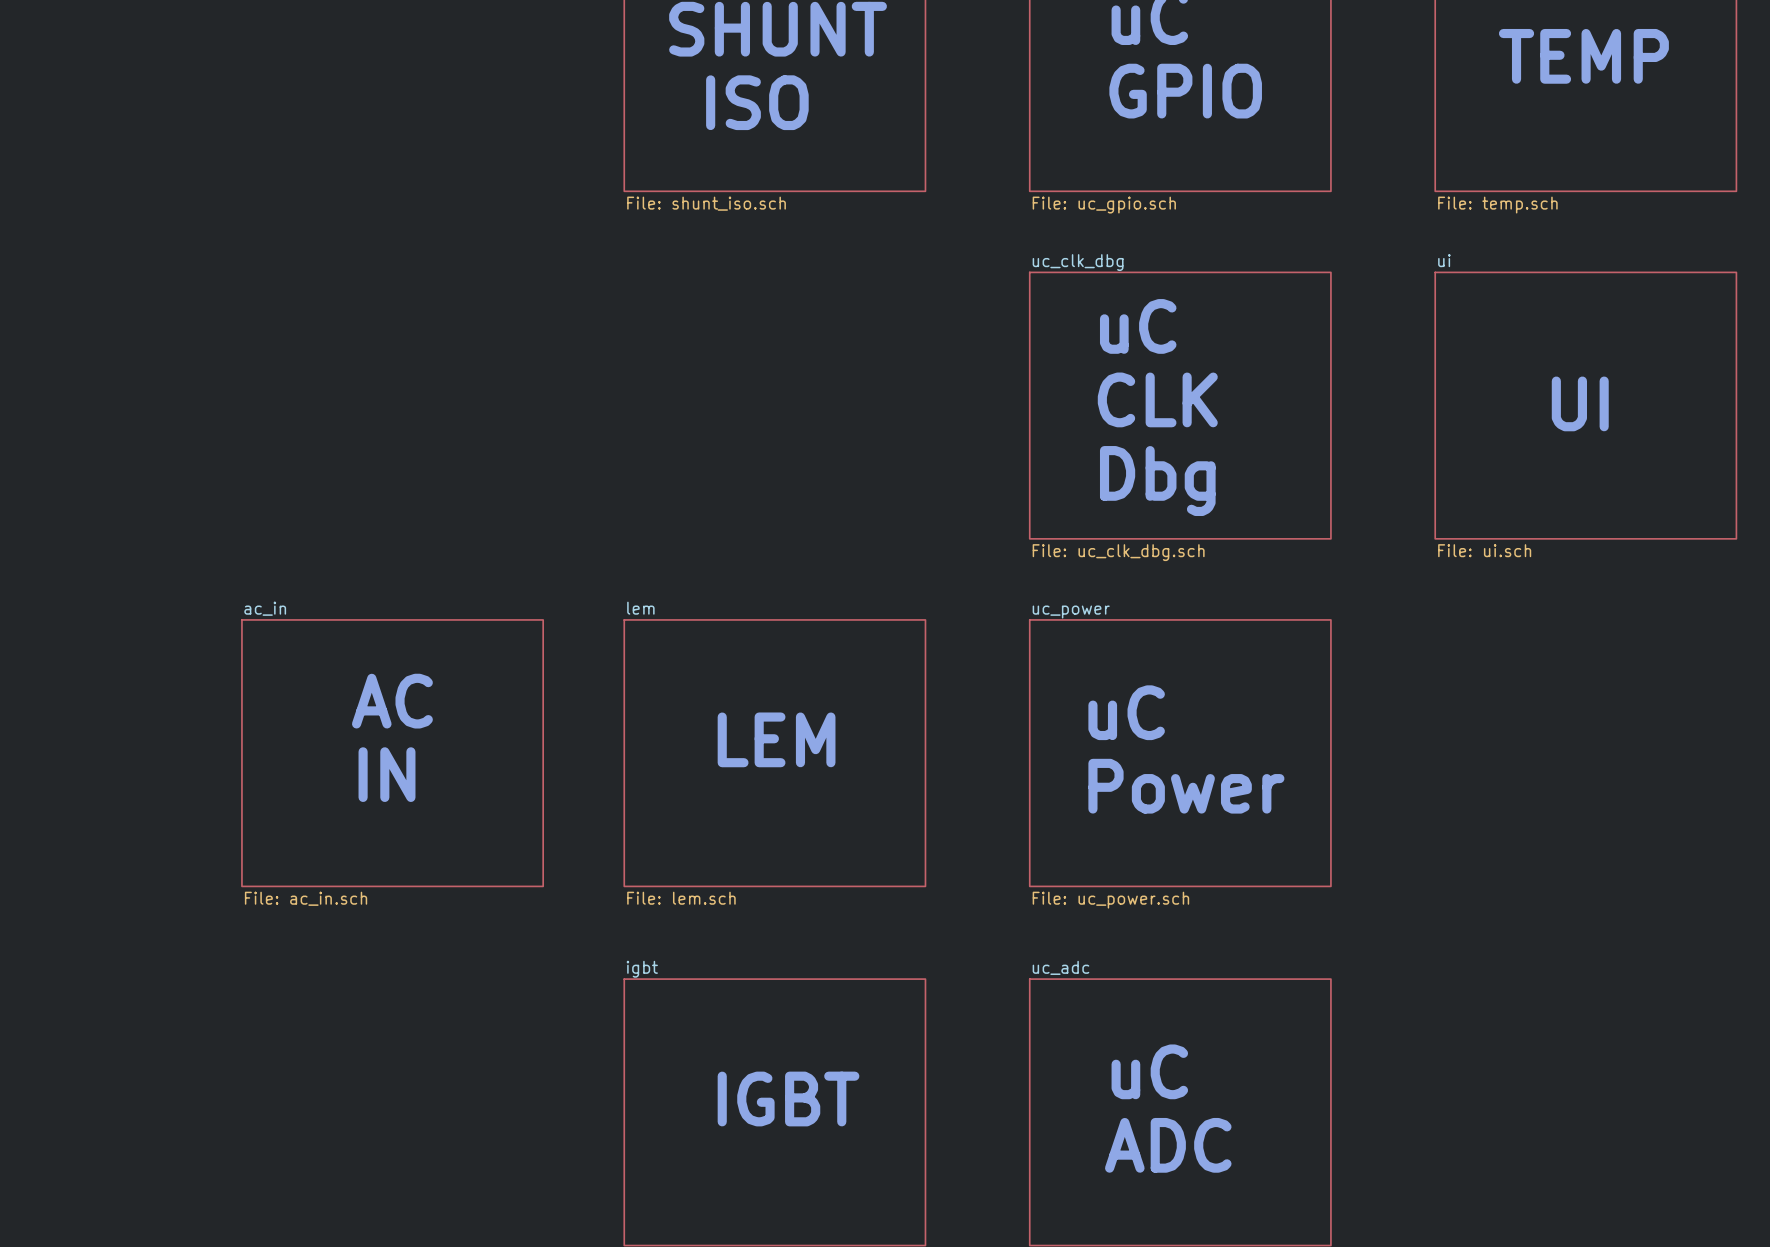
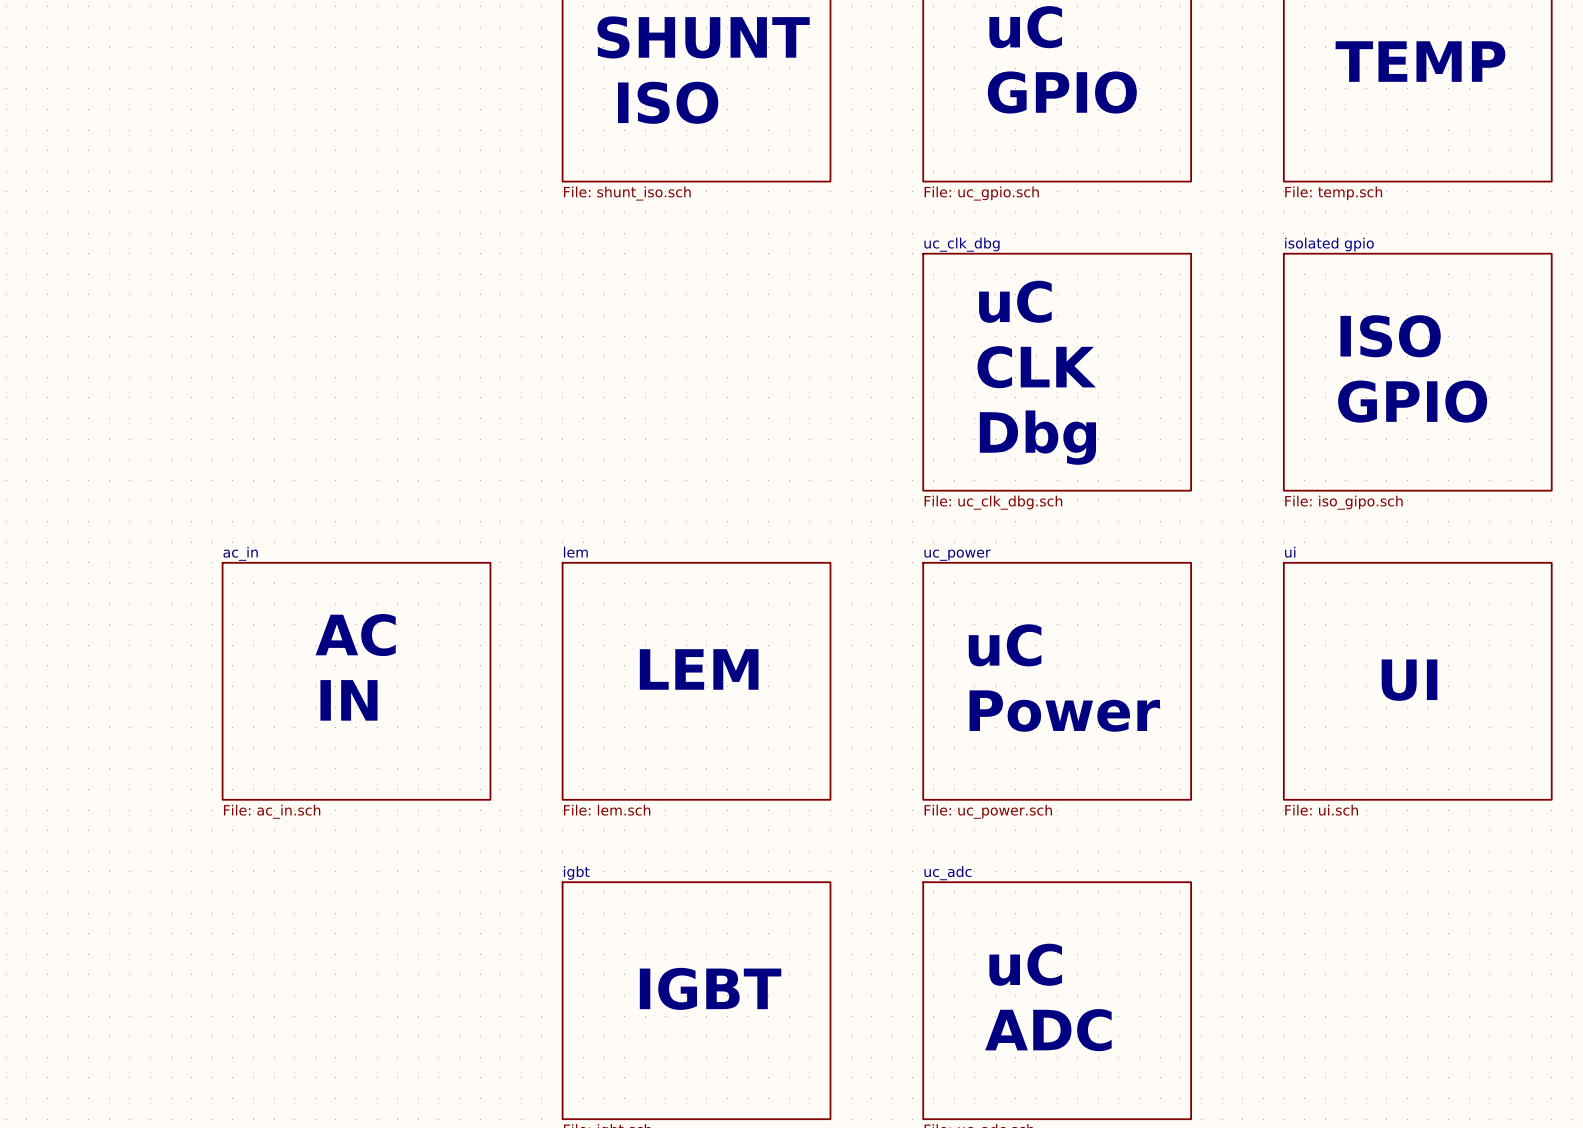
sheet ui name: ui (1444, 260) -> isolated gpio (1329, 244)
text: none -> ISO (1390, 336)
text: UI (1580, 403) -> none
text: none -> GPIO (1412, 401)
sheet ui value: File: ui.sch (1484, 550) -> File: iso_gipo.sch (1343, 502)
text: none -> UI (1409, 680)
sheet ui: none -> File: ui.sch (1417, 681)

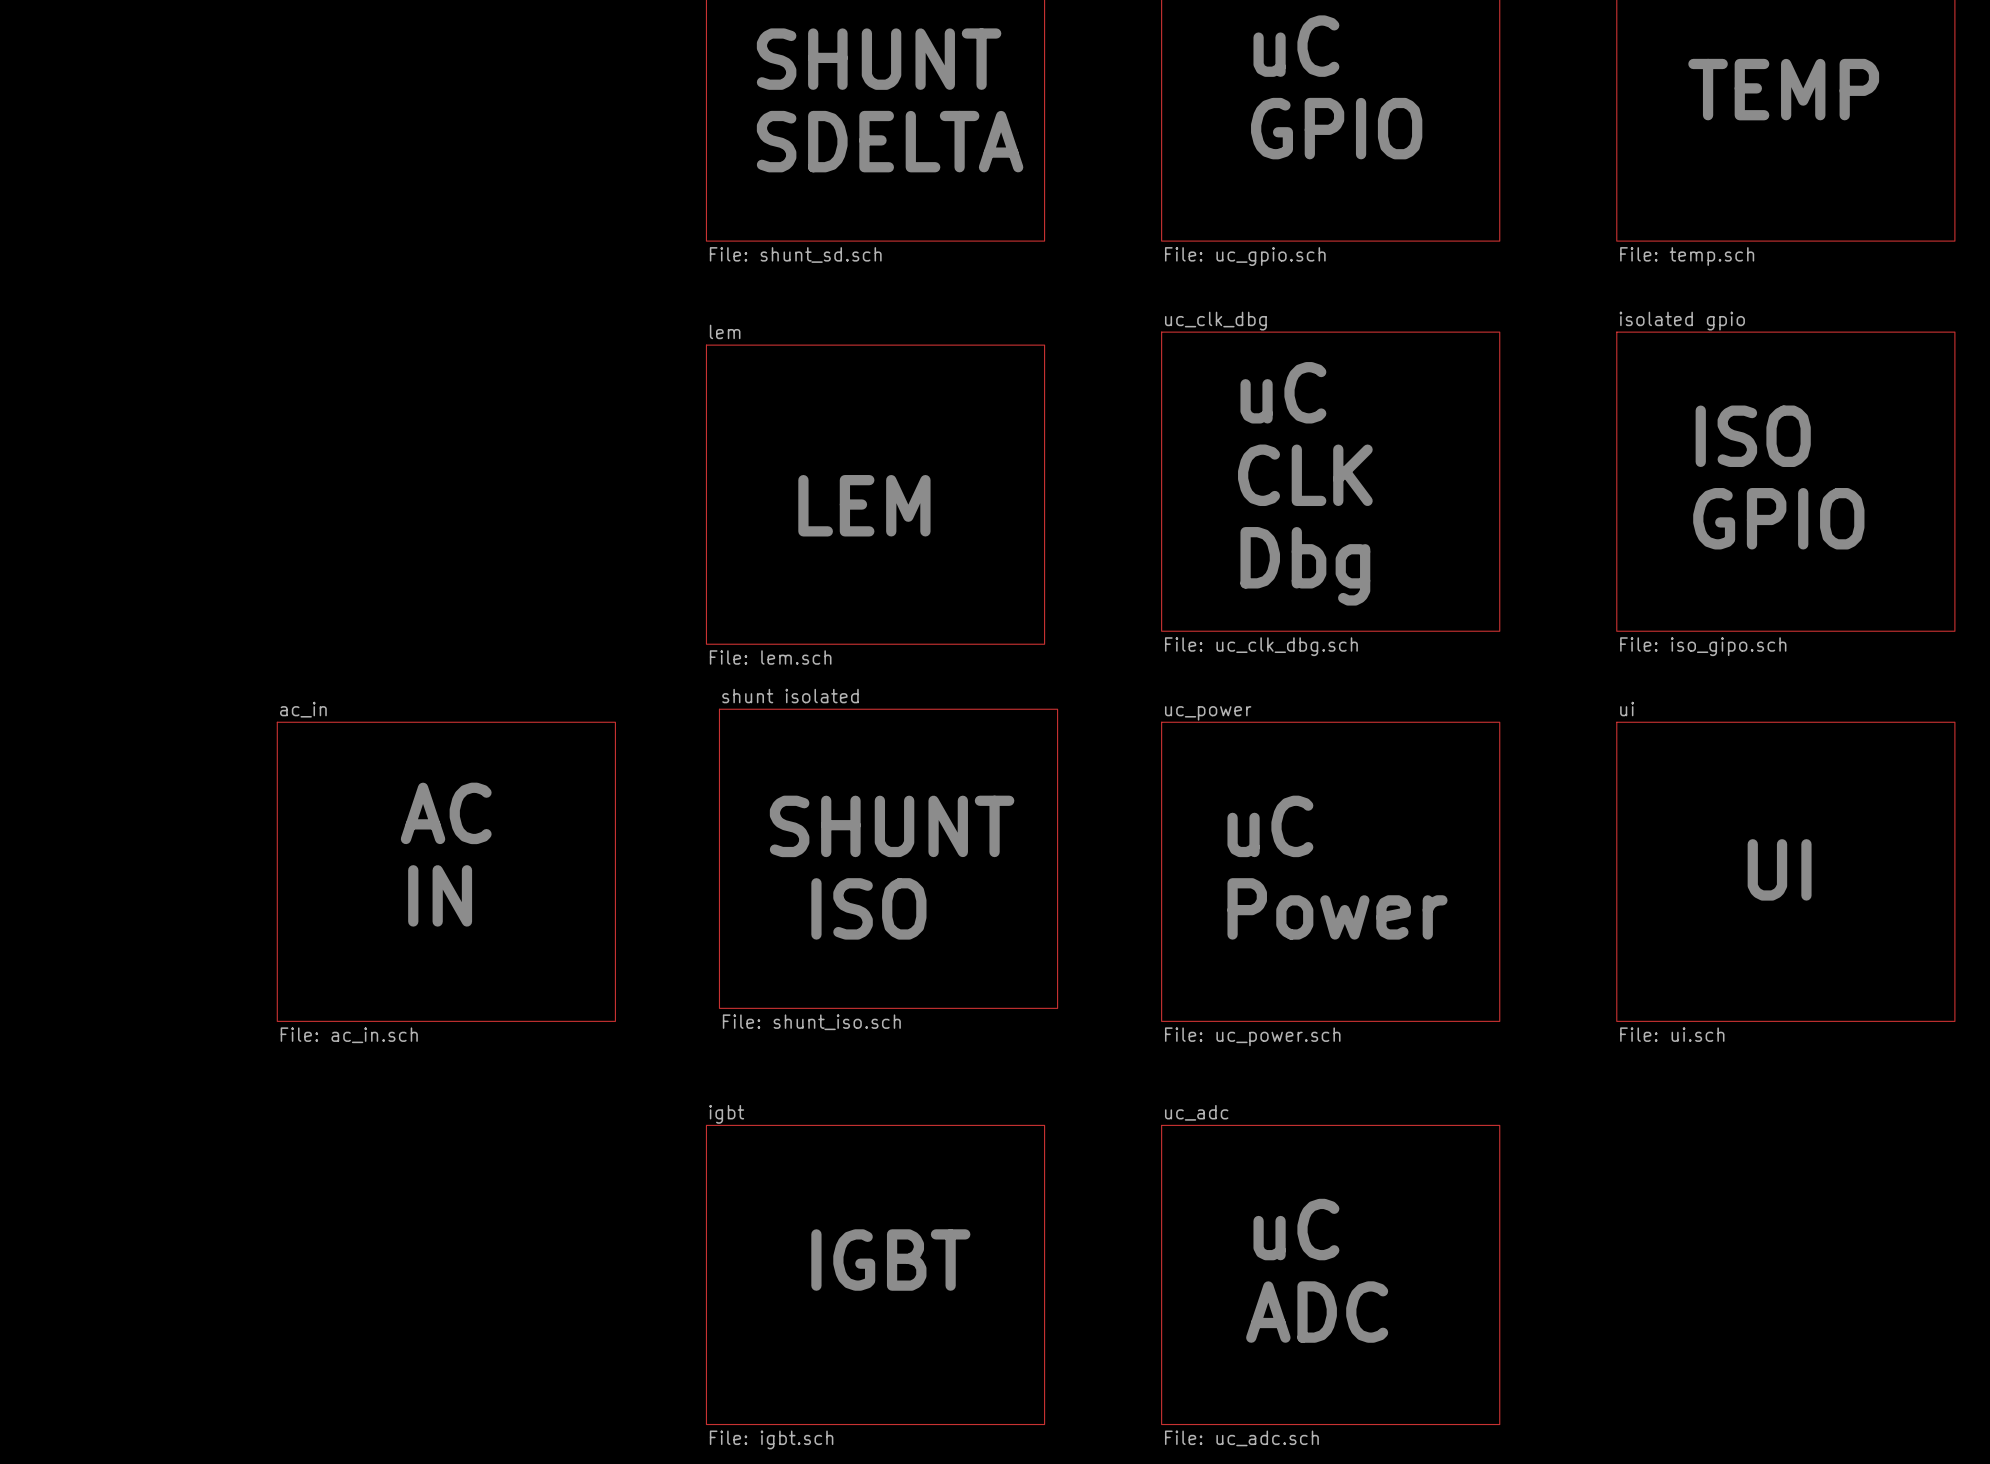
text: ISO (668, 102) -> SDELTA (890, 141)
sheet value: File: shunt_iso.sch (627, 193) -> File: shunt_sd.sch (795, 254)
sheet lem: none -> File: lem.sch (875, 494)
text: none -> LEM (864, 505)
text: none -> SHUNT (892, 826)
text: LEM (699, 669) -> none
sheet shunt isolated: none -> File: shunt_iso.sch (888, 858)
sheet lem: File: lem.sch (696, 681) -> none
text: none -> ISO (868, 908)

